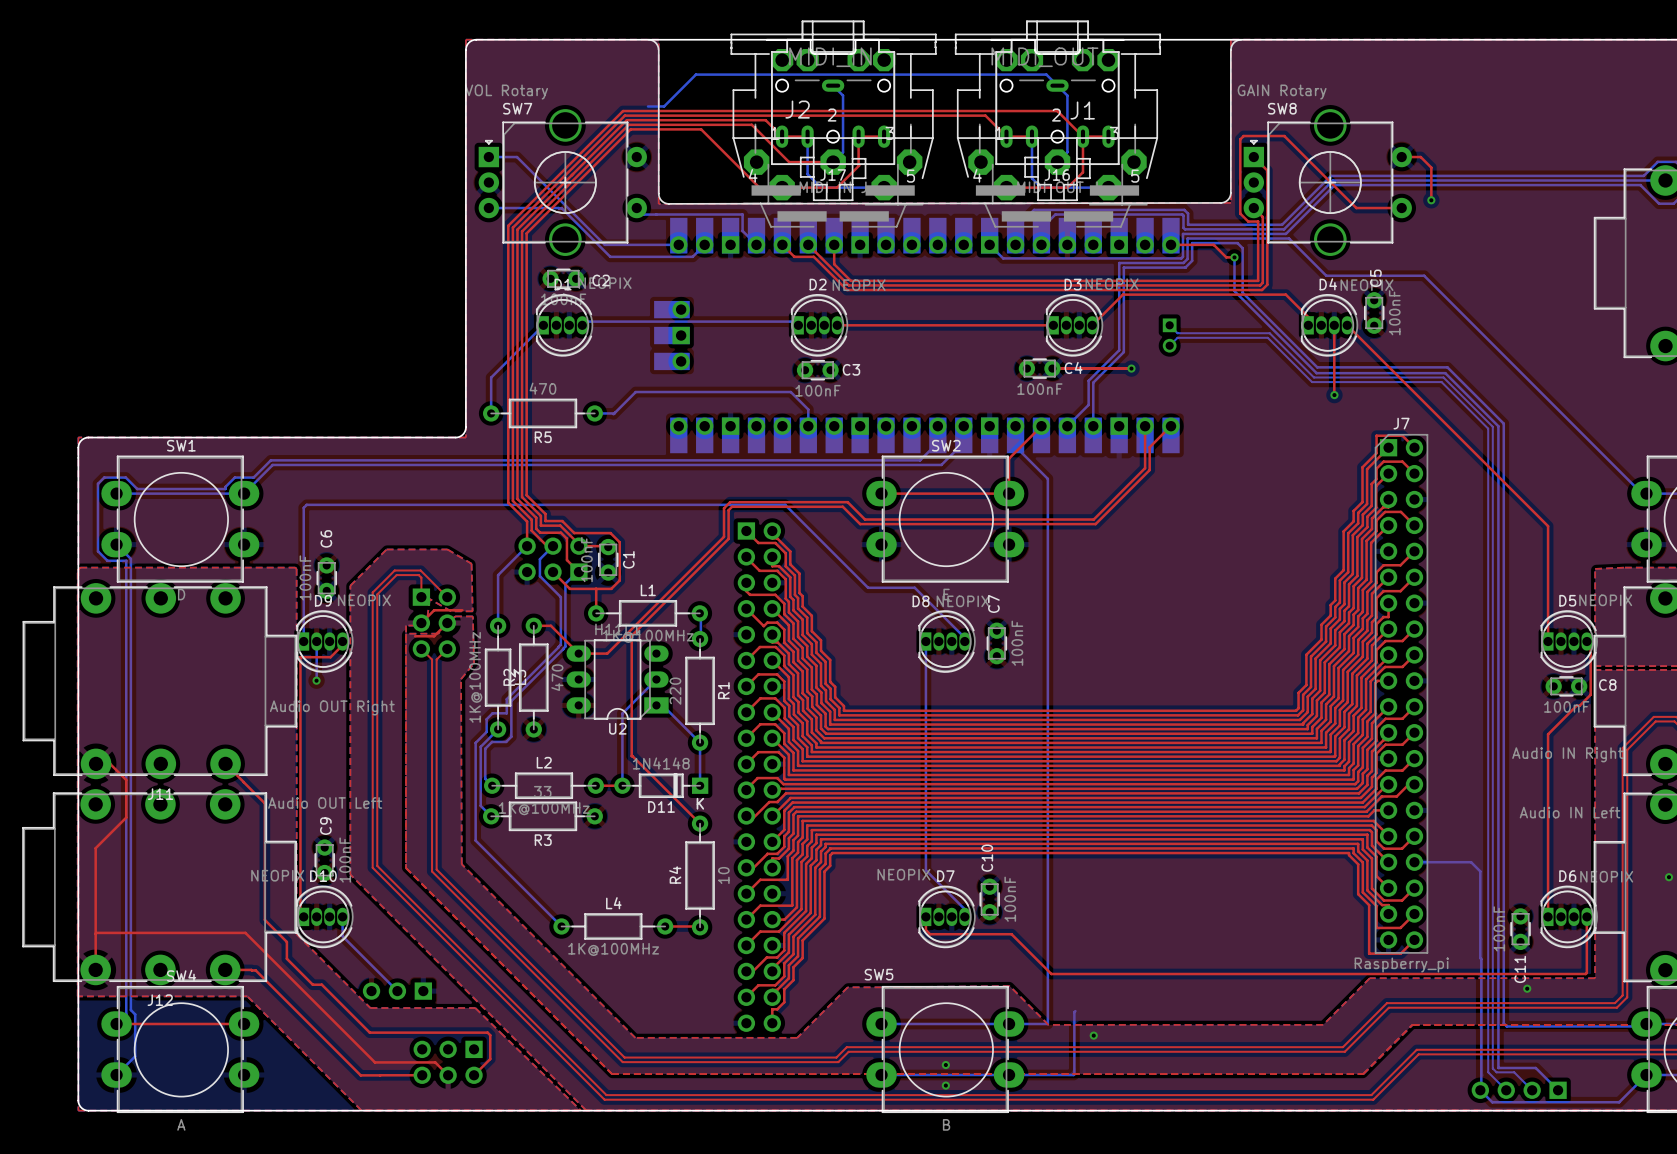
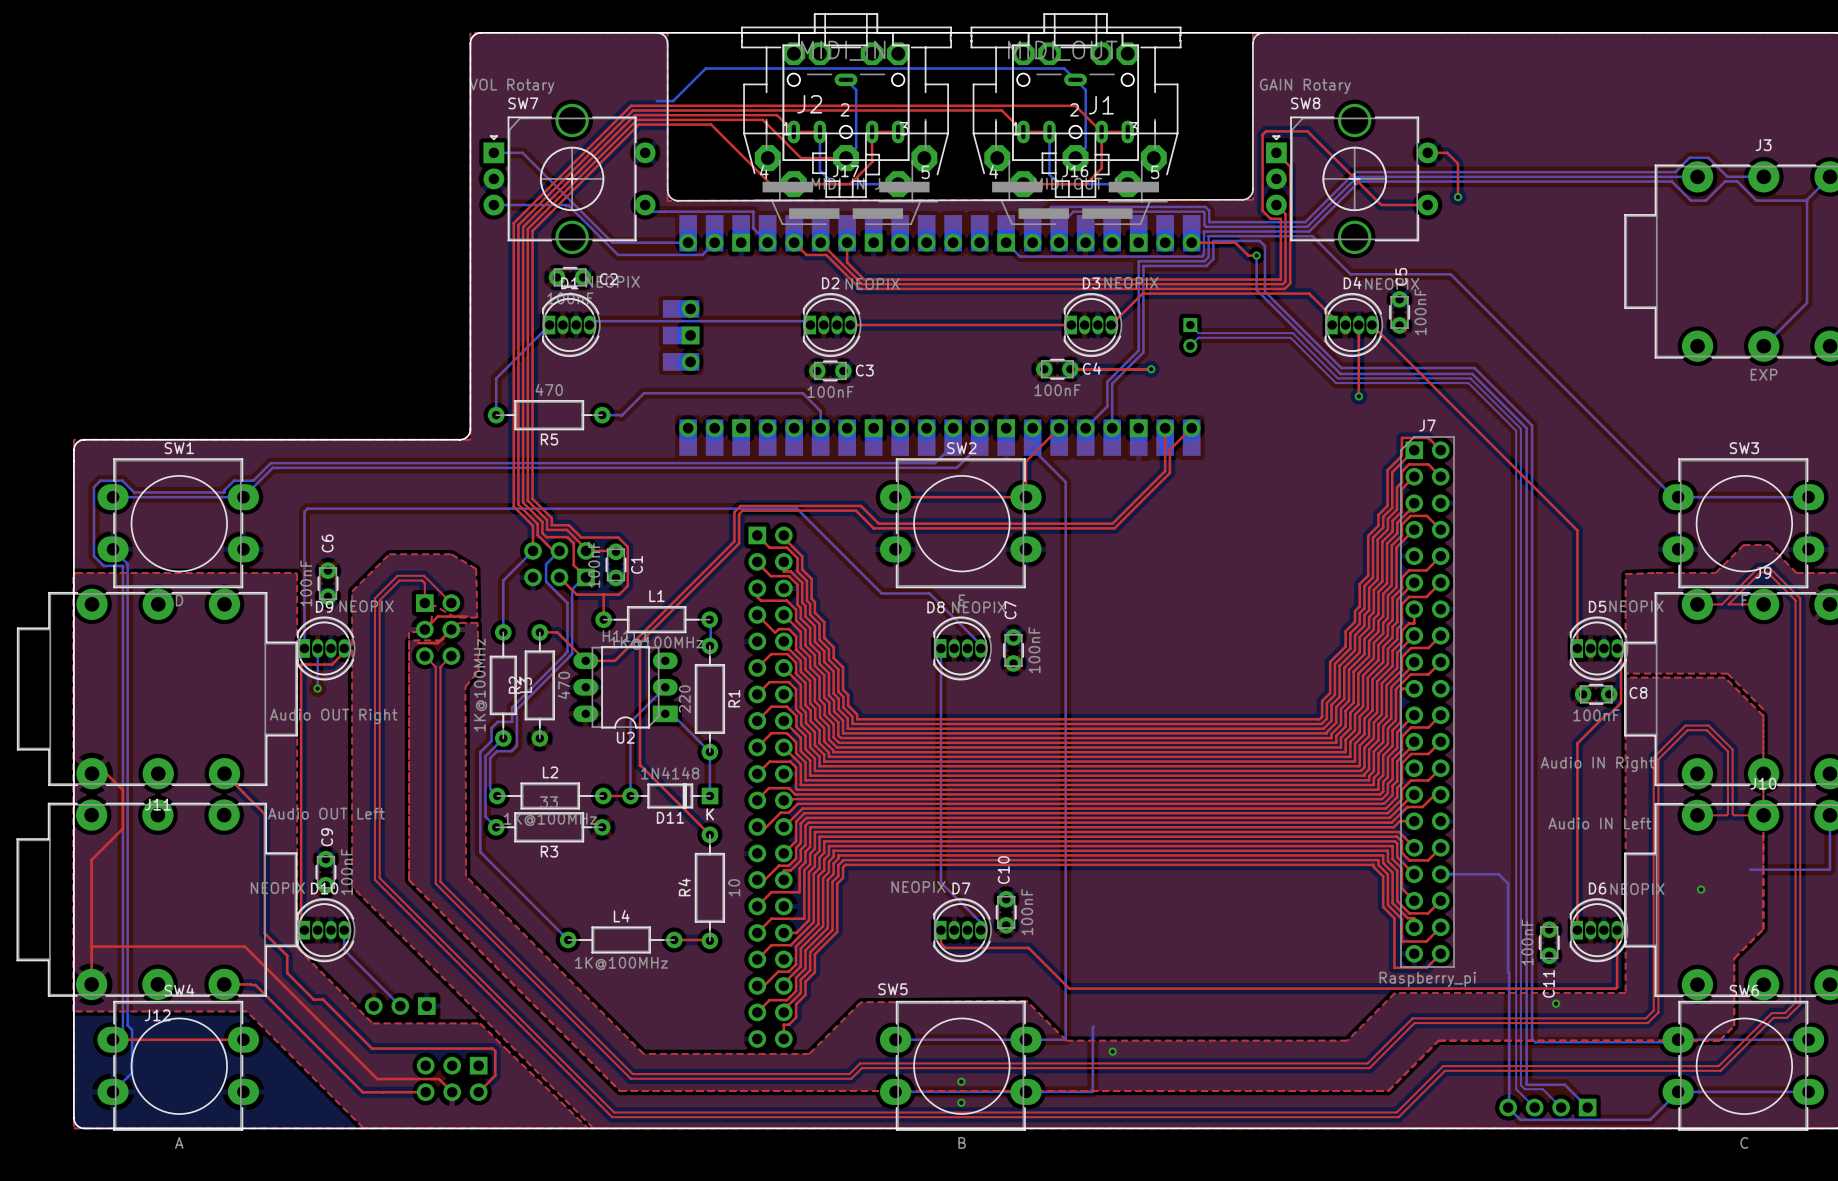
J17 footprint: [766, 20, 901, 165] -> [782, 13, 910, 161]
J16 footprint: [990, 20, 1125, 165] -> [1012, 13, 1139, 161]

